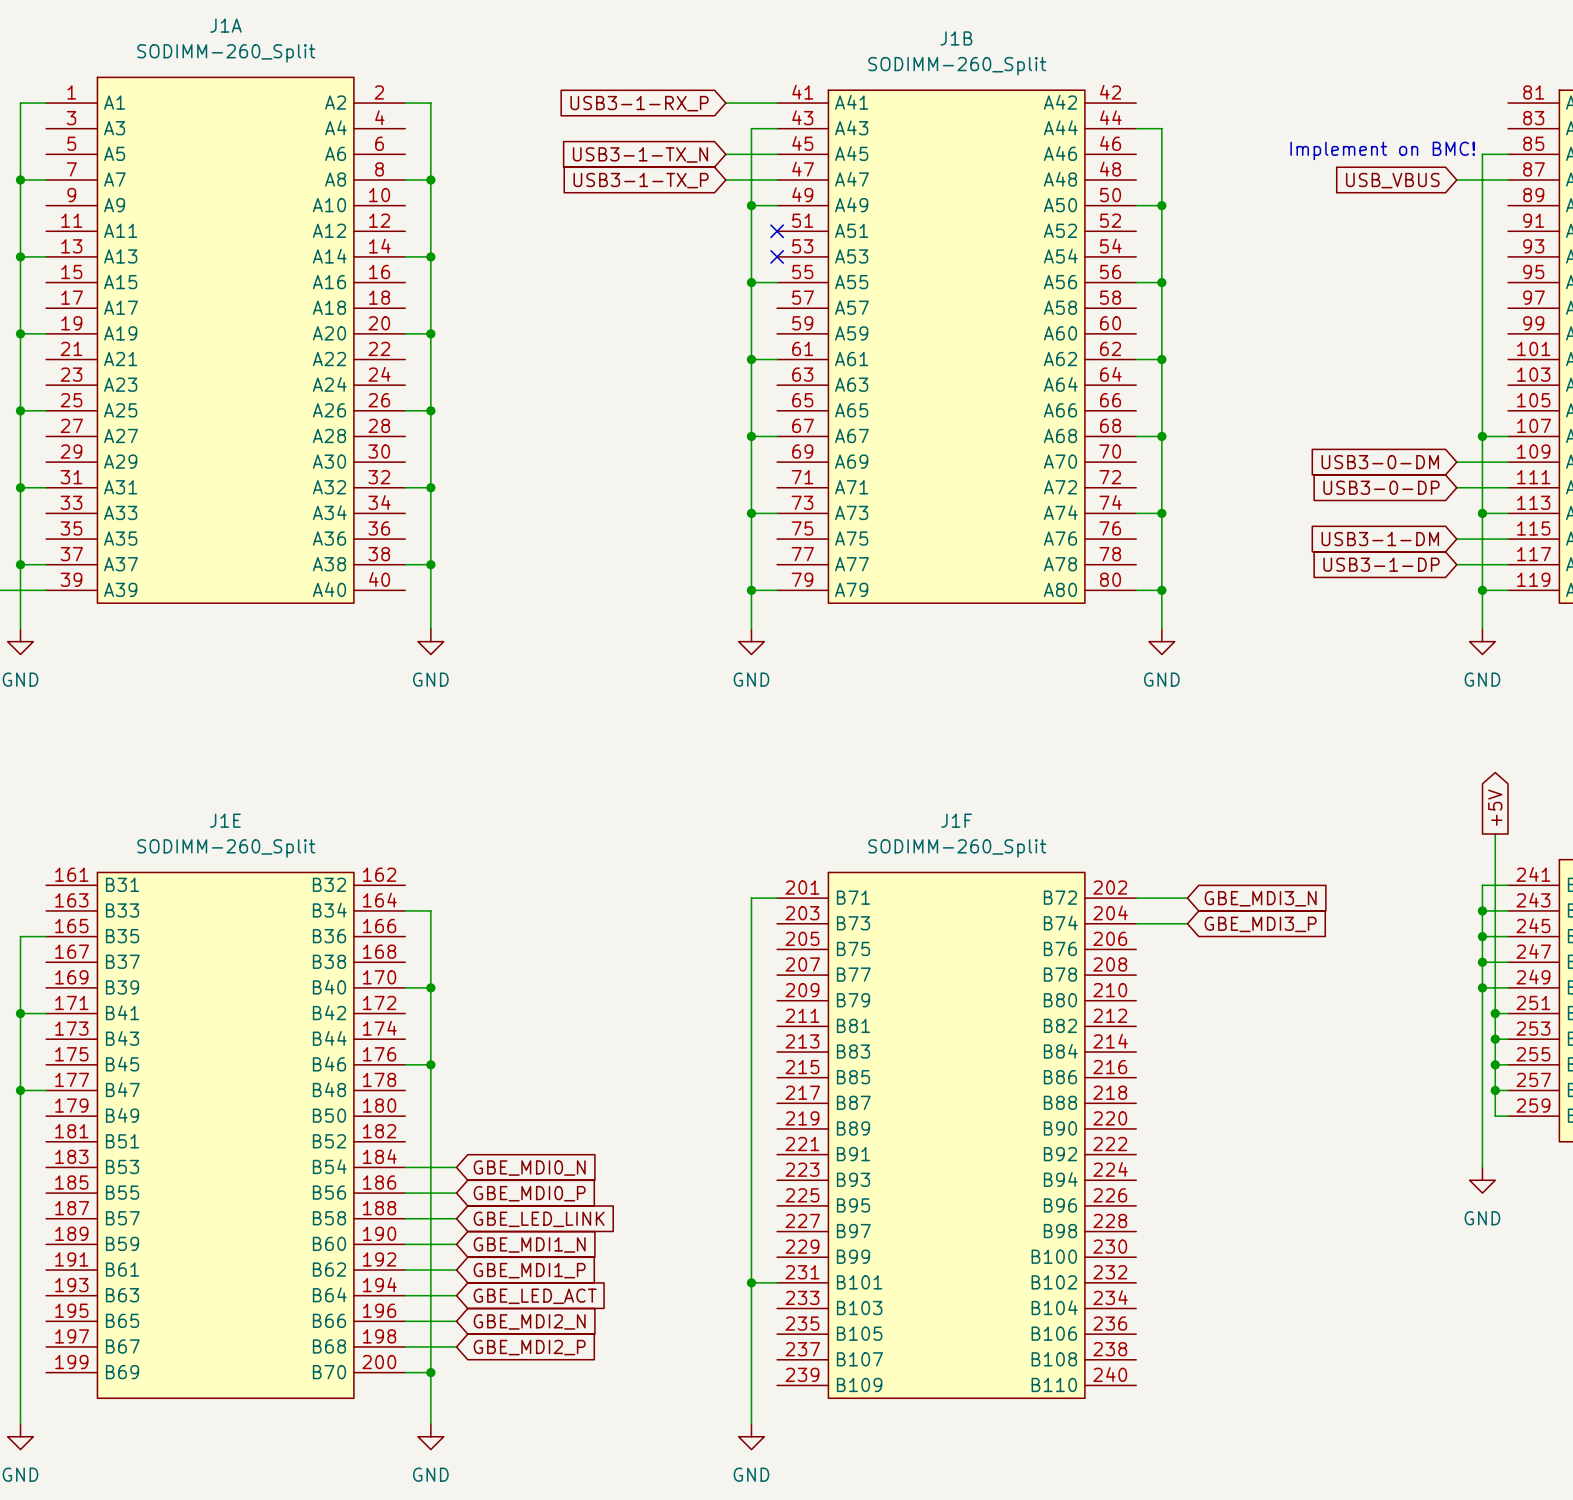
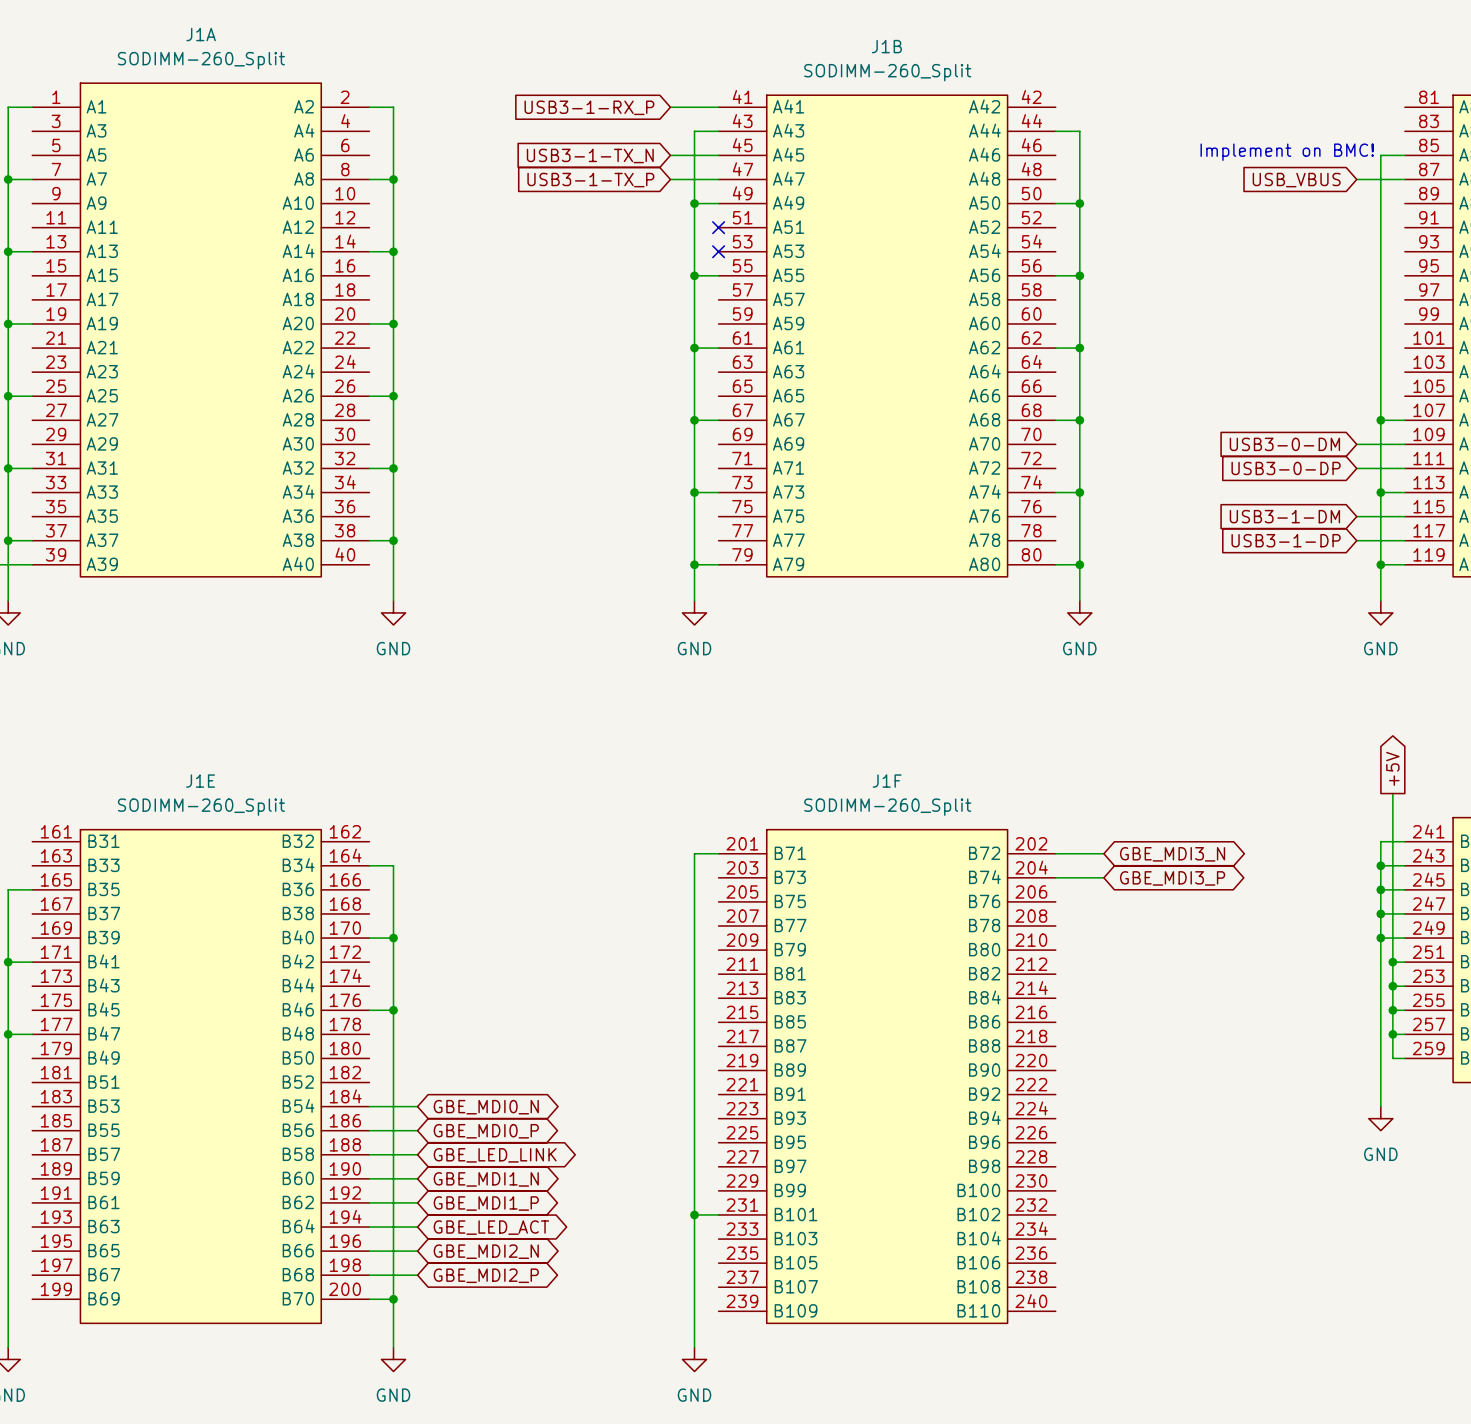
global label shape: input (1260, 898) -> bidirectional (1172, 854)
global label shape: input (1260, 924) -> bidirectional (1172, 878)
global label shape: input (529, 1168) -> bidirectional (486, 1107)
global label shape: input (529, 1193) -> bidirectional (486, 1131)
global label shape: input (539, 1219) -> bidirectional (495, 1155)
global label shape: input (529, 1244) -> bidirectional (486, 1179)
global label shape: input (529, 1270) -> bidirectional (486, 1203)
global label shape: input (535, 1296) -> bidirectional (491, 1227)
global label shape: input (529, 1321) -> bidirectional (486, 1251)
global label shape: input (529, 1347) -> bidirectional (486, 1275)

